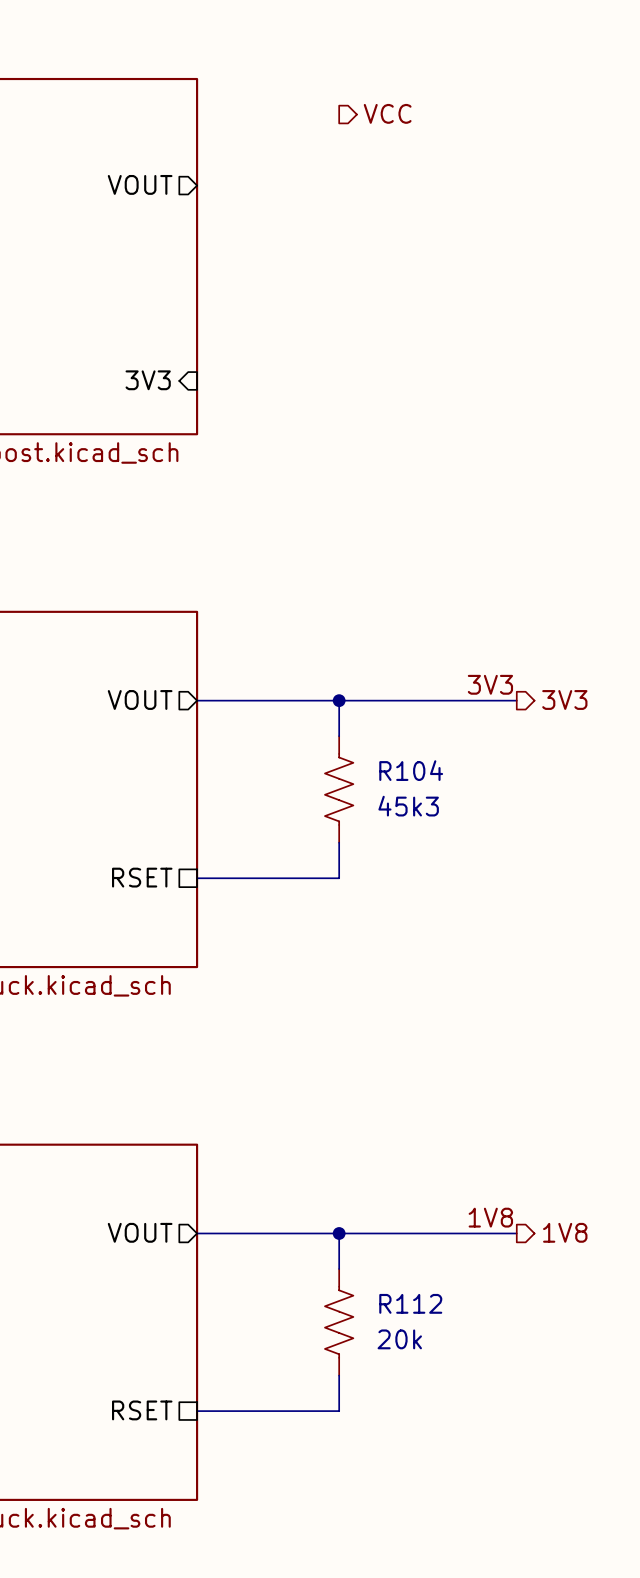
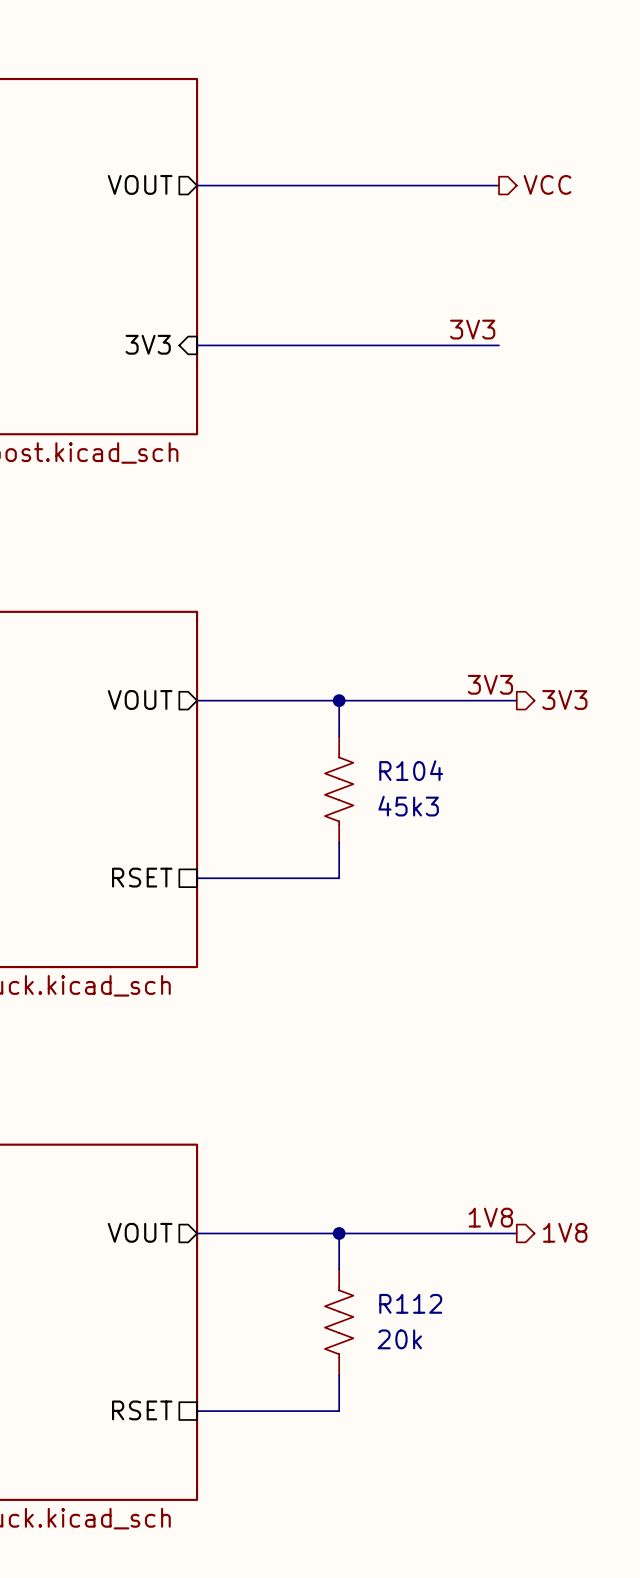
hierarchical label position: VCC (387, 113) -> VCC (547, 184)
wire: none -> (197, 185) (499, 185)
label: none -> 3V3 (472, 329)
wire: none -> (197, 345) (499, 345)
sheet pin position: 3V3 (148, 380) -> 3V3 (148, 344)

